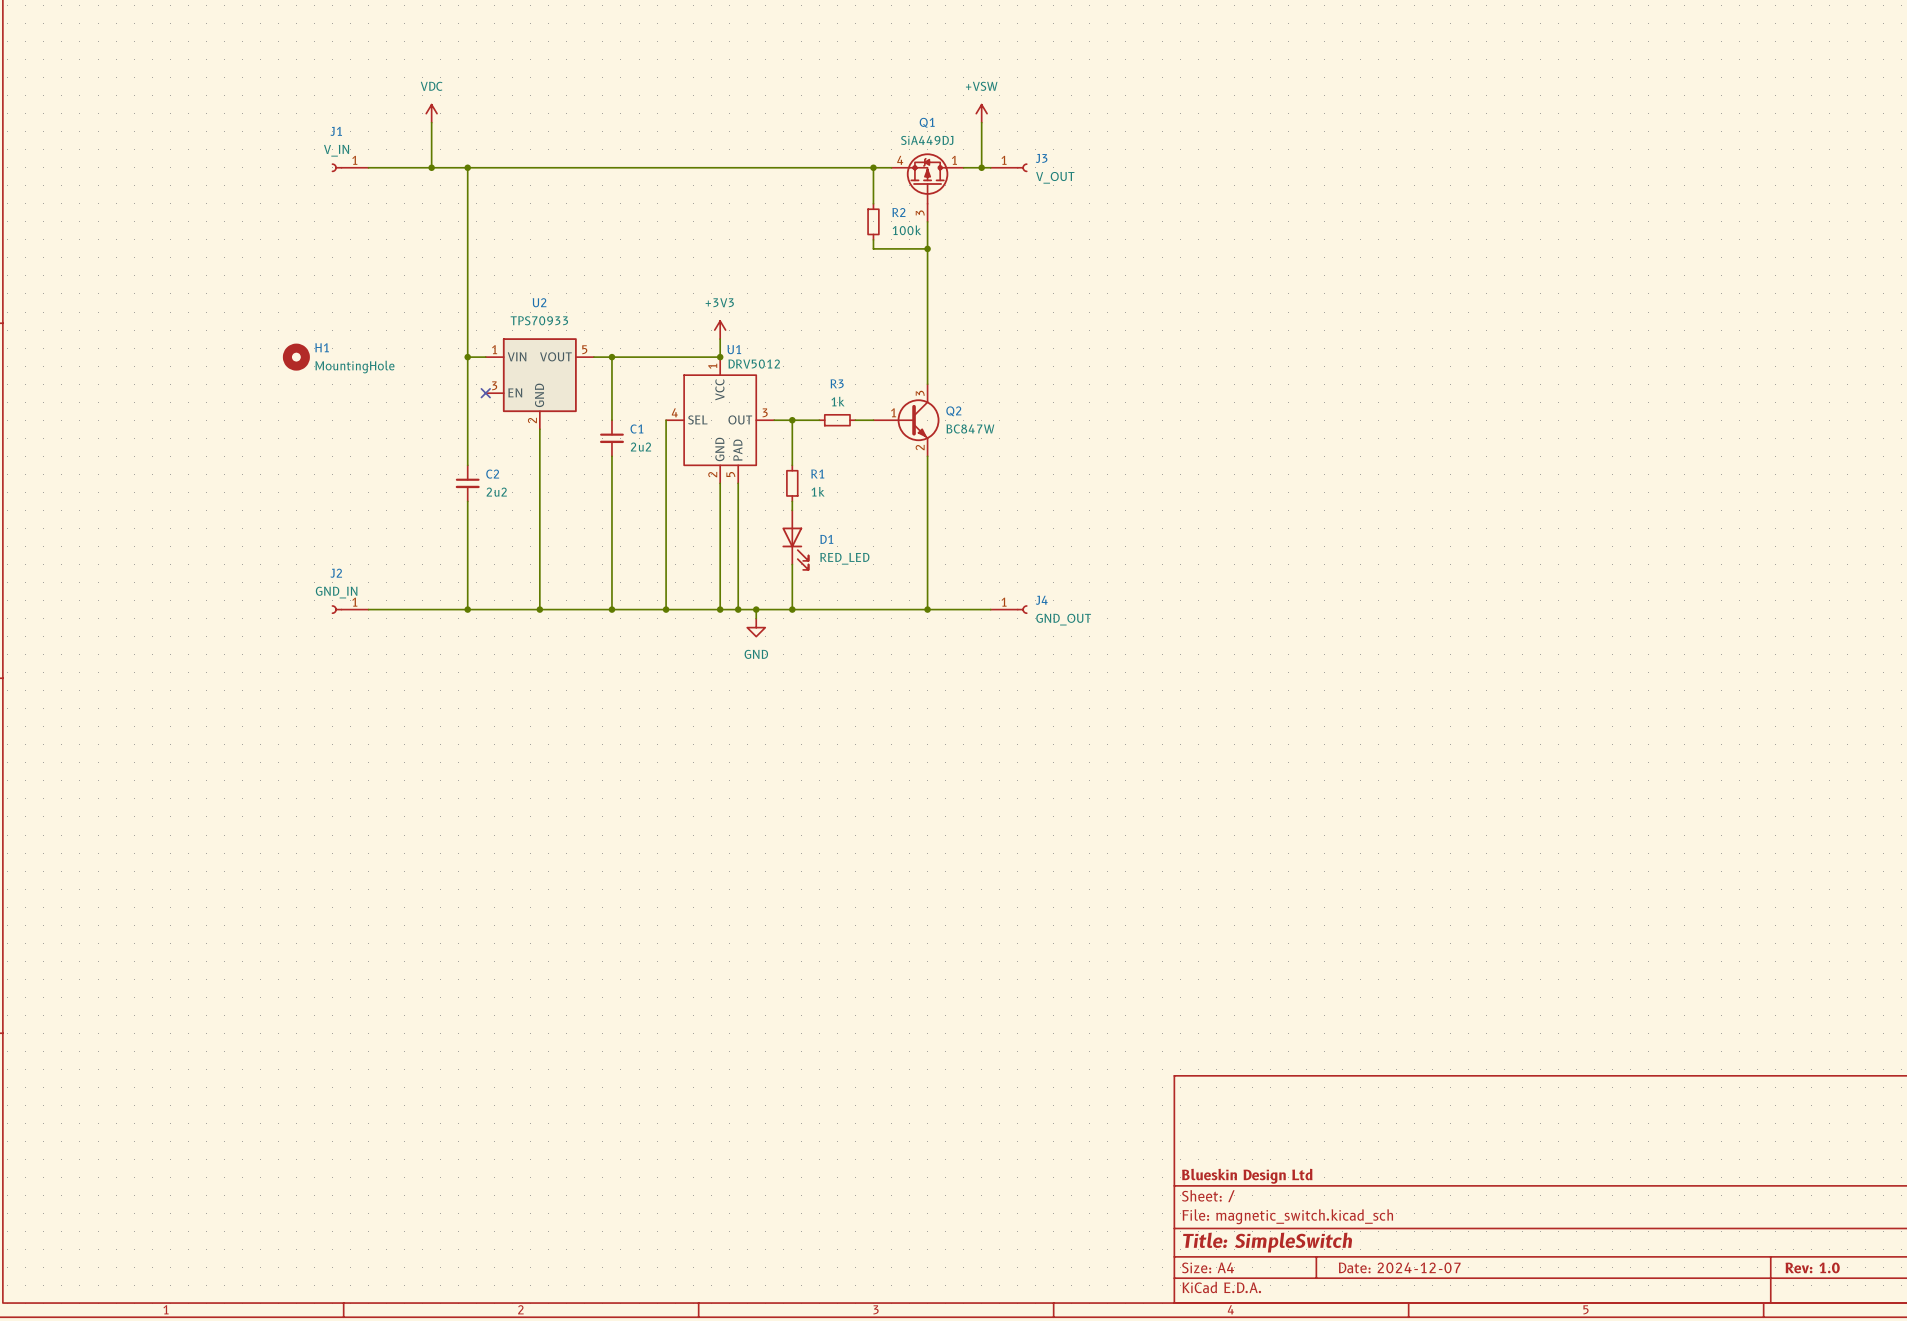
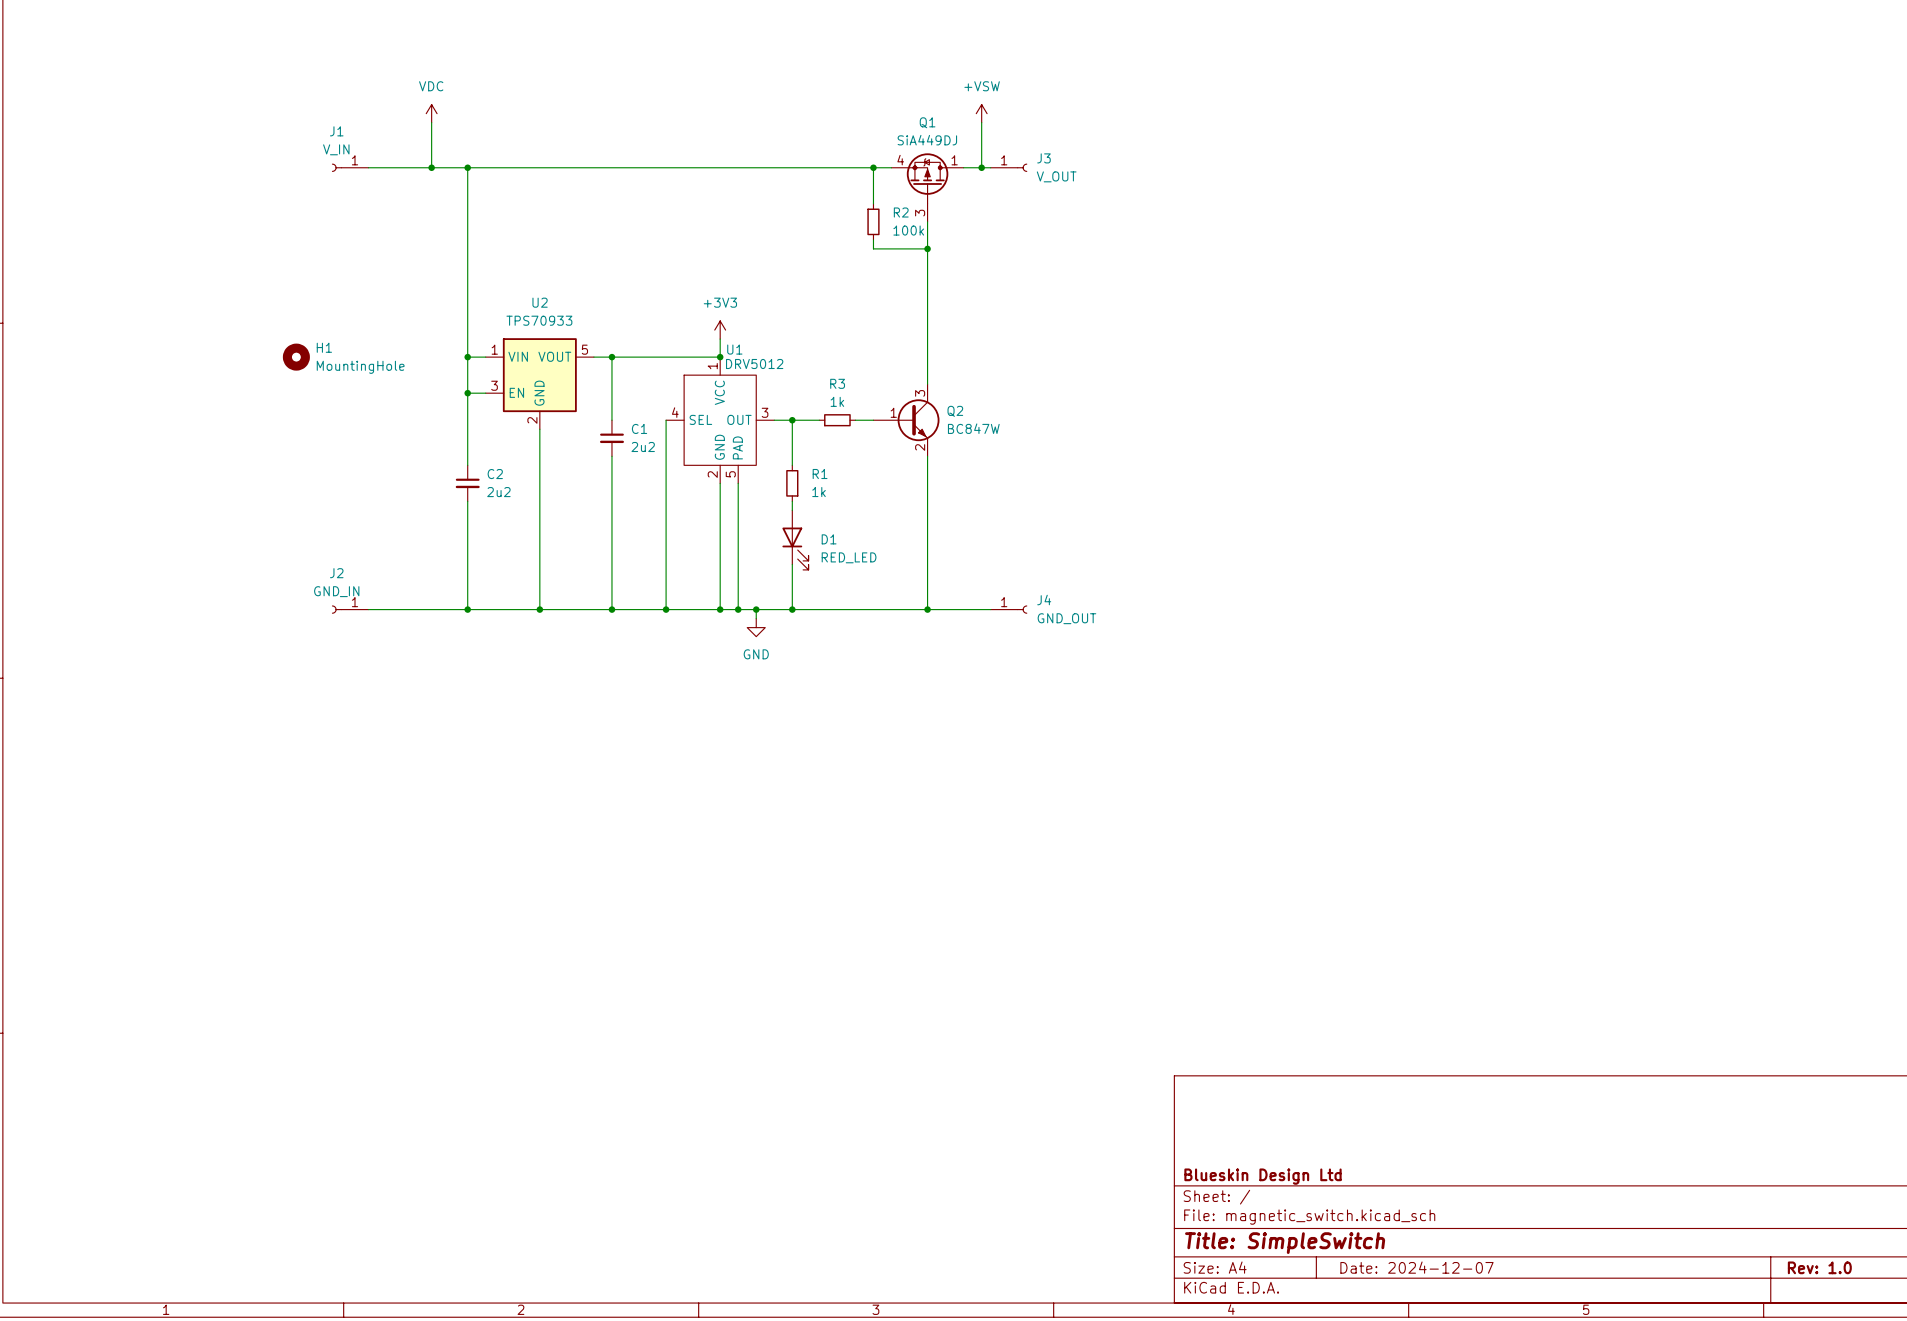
wire: none -> (467, 393) (485, 393)
junction: none -> (467, 393)
no-connect mark: (485, 393) -> none

